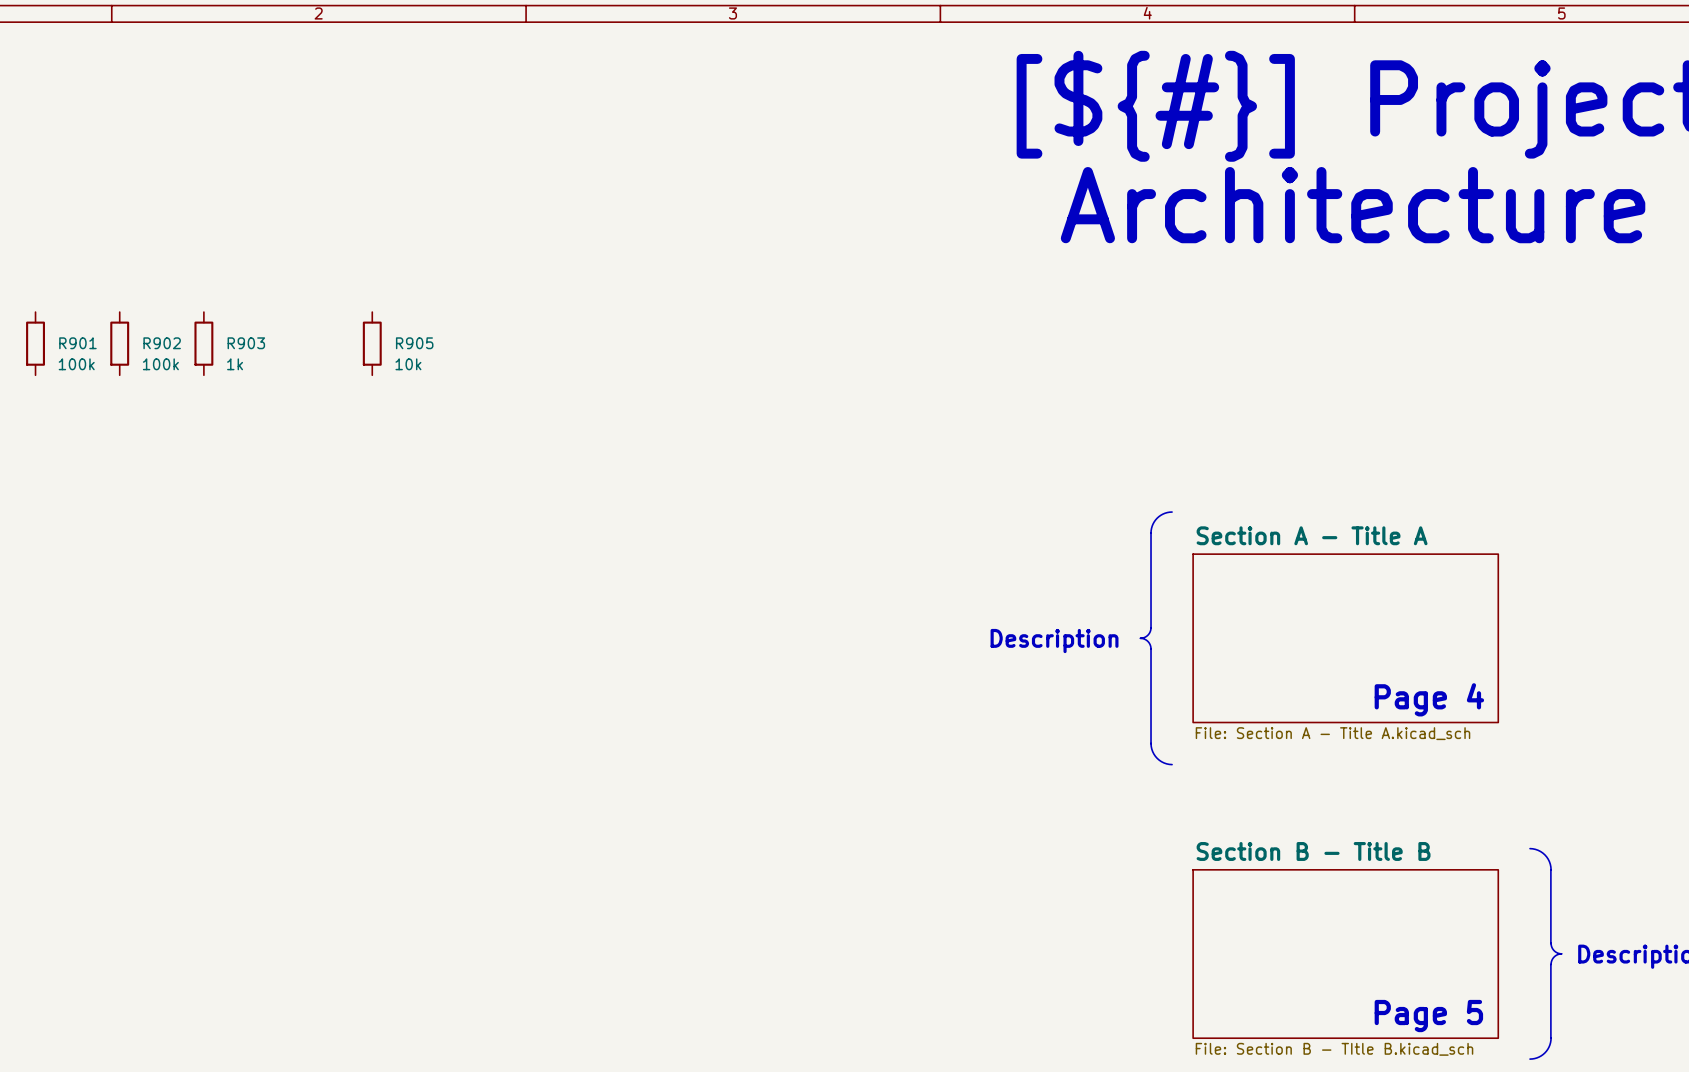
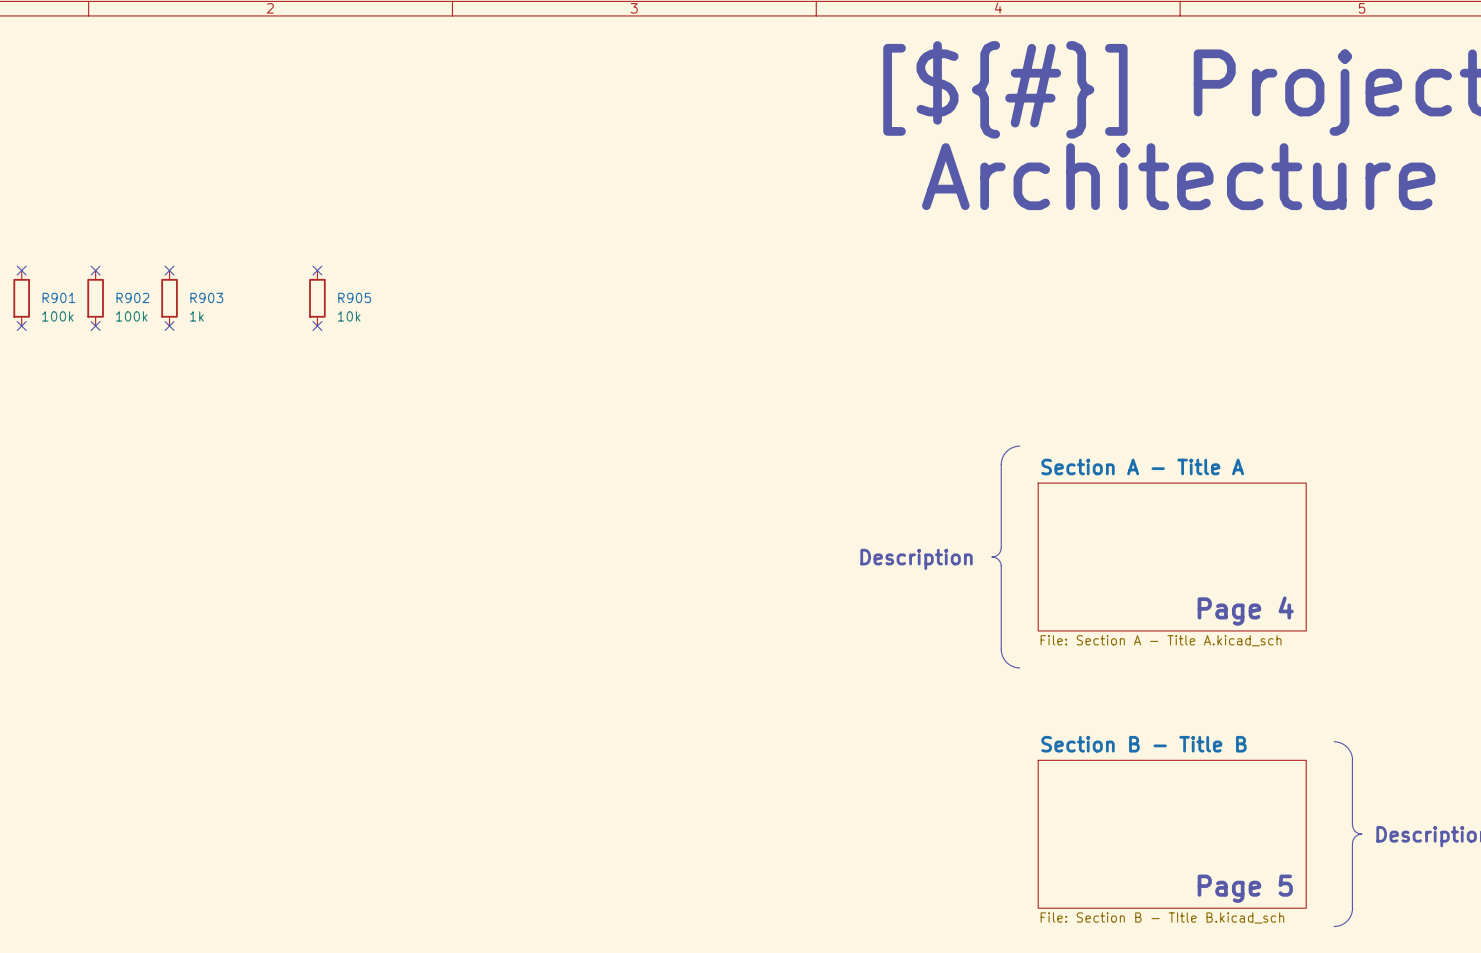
no-connect mark: none -> (21, 270)
no-connect mark: none -> (95, 270)
no-connect mark: none -> (169, 270)
no-connect mark: none -> (317, 270)
no-connect mark: none -> (21, 326)
no-connect mark: none -> (95, 326)
no-connect mark: none -> (169, 326)
no-connect mark: none -> (317, 326)

